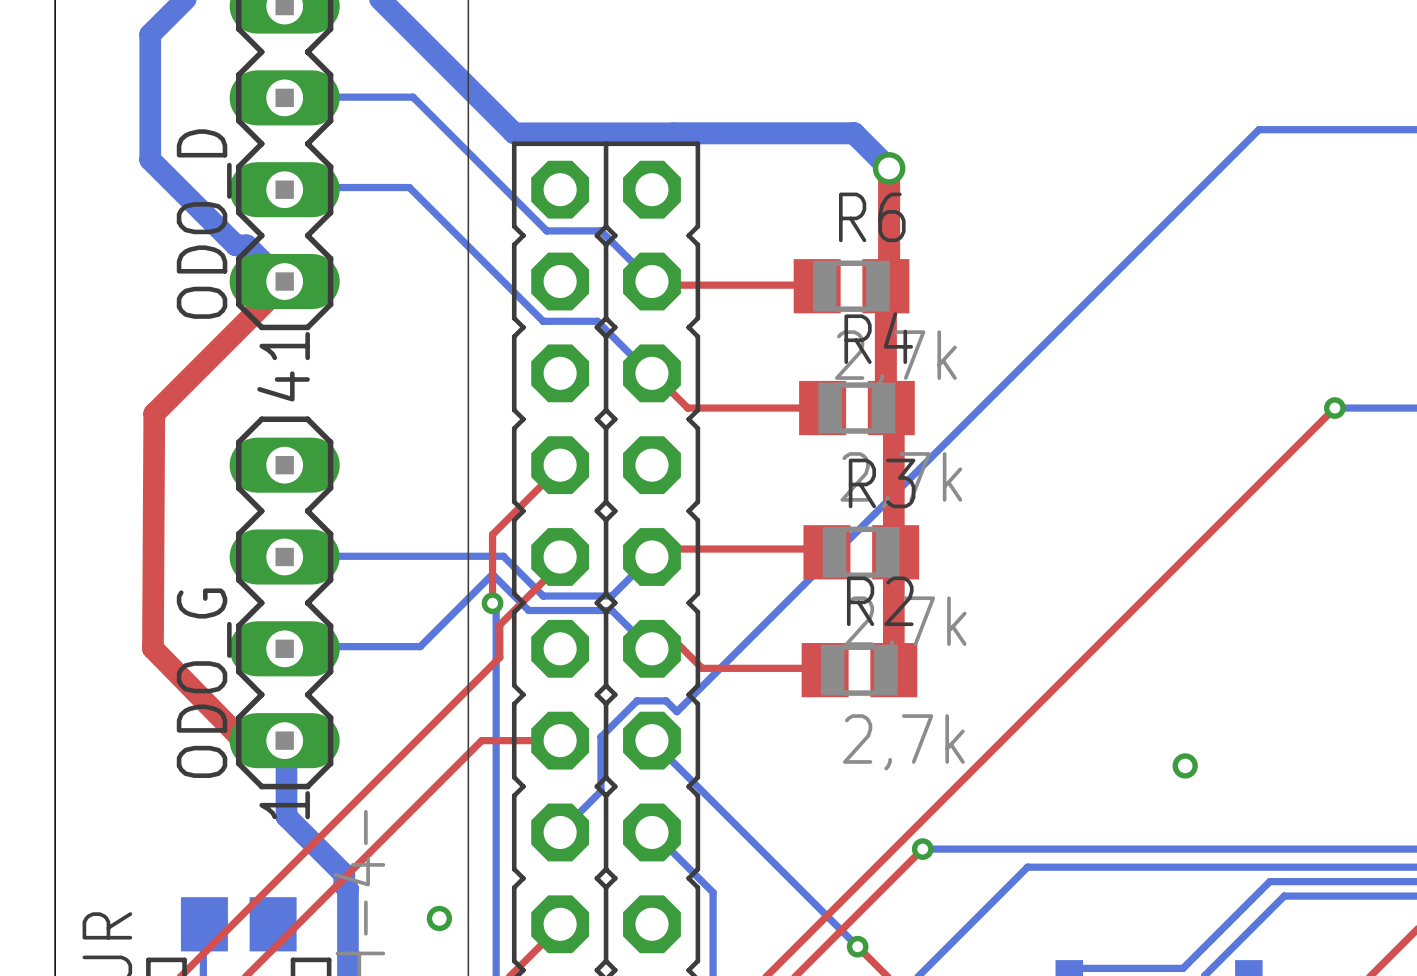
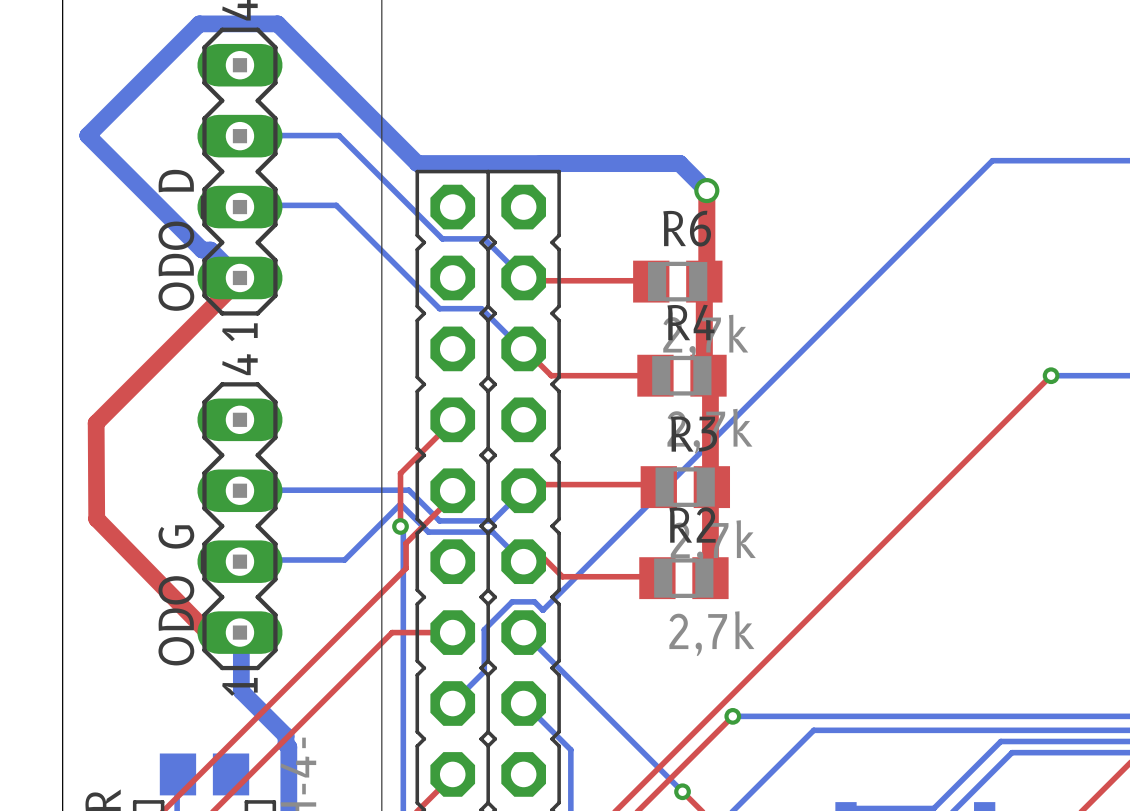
bottom track: (150, 34) (150, 159) -> (136, 87) (87, 135) (136, 183)
top track: (154, 413) (152, 648) -> (139, 380) (96, 423) (96, 518) (138, 561)
via: (1185, 765) -> none
via: (439, 918) -> none

